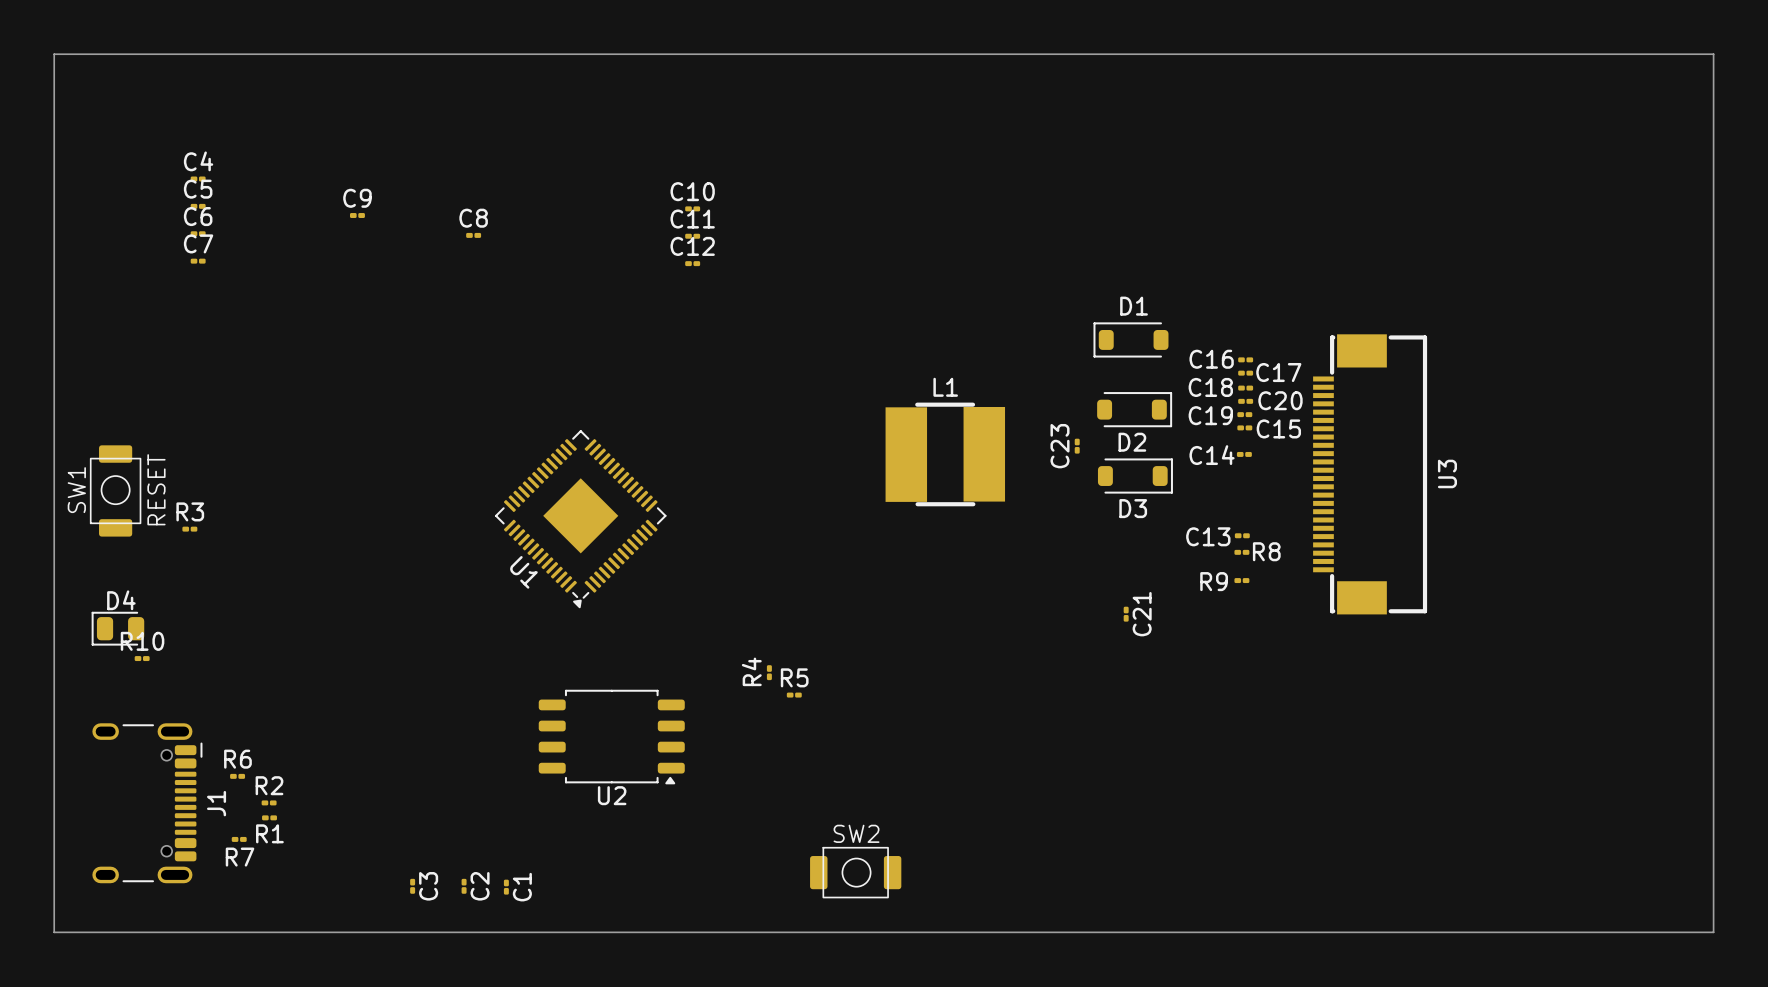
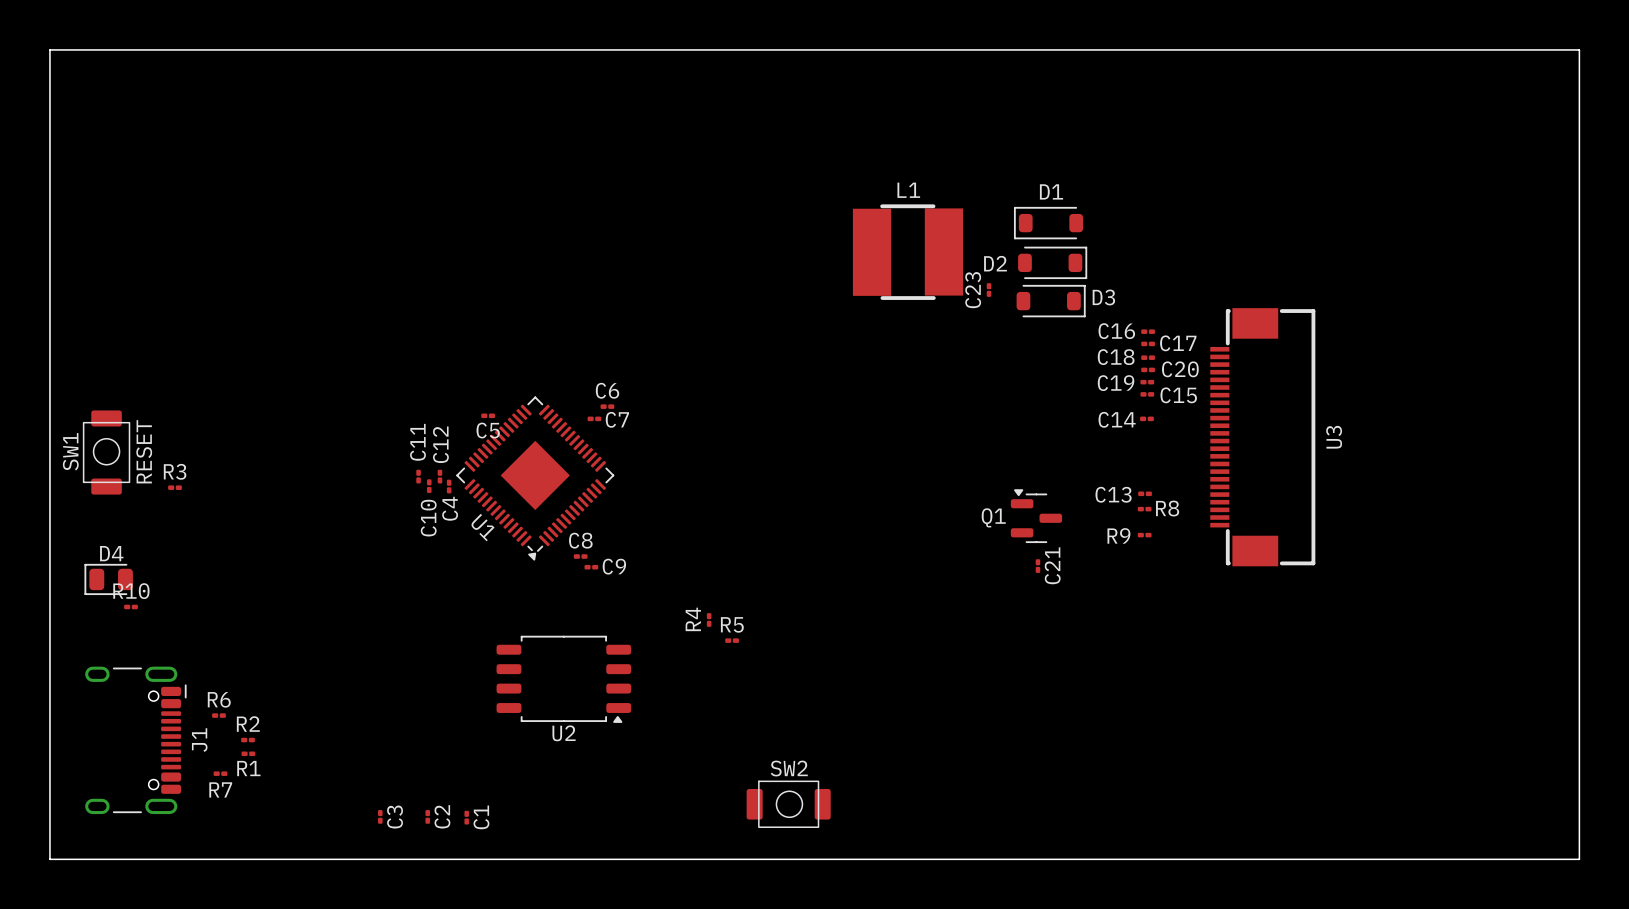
C4 rotation: 0° (198, 178) -> 90° clockwise (449, 486)
C4 position: (198, 178) -> (449, 486)
C5 name position: C5 (198, 189) -> C5 (488, 430)
C10 name position: C10 (692, 191) -> C10 (428, 518)
C9 name position: C9 (357, 198) -> C9 (614, 566)
C5 position: (198, 206) -> (488, 415)
C10 rotation: 0° (692, 208) -> 90° clockwise (429, 486)
C10 position: (692, 208) -> (429, 486)
C9 position: (357, 215) -> (591, 567)
C6 position: (198, 233) -> (607, 406)
C8 position: (473, 235) -> (580, 556)
C11 rotation: 0° (692, 236) -> 90° clockwise (418, 476)
C11 position: (692, 236) -> (418, 476)
C7 name position: C7 (198, 243) -> C7 (617, 419)
C7 position: (198, 261) -> (594, 418)
C12 rotation: 0° (692, 263) -> 90° clockwise (439, 476)
C12 position: (692, 263) -> (439, 476)
D1 position: (1130, 339) -> (1048, 223)
D2 position: (1134, 409) -> (1052, 262)
D2 name position: D2 (1132, 442) -> D2 (995, 263)
C23 position: (1077, 446) -> (989, 290)
L1 position: (945, 454) -> (907, 252)
D3 position: (1135, 476) -> (1051, 301)
D3 name position: D3 (1133, 508) -> D3 (1103, 297)
Q1: none -> (1036, 516)

